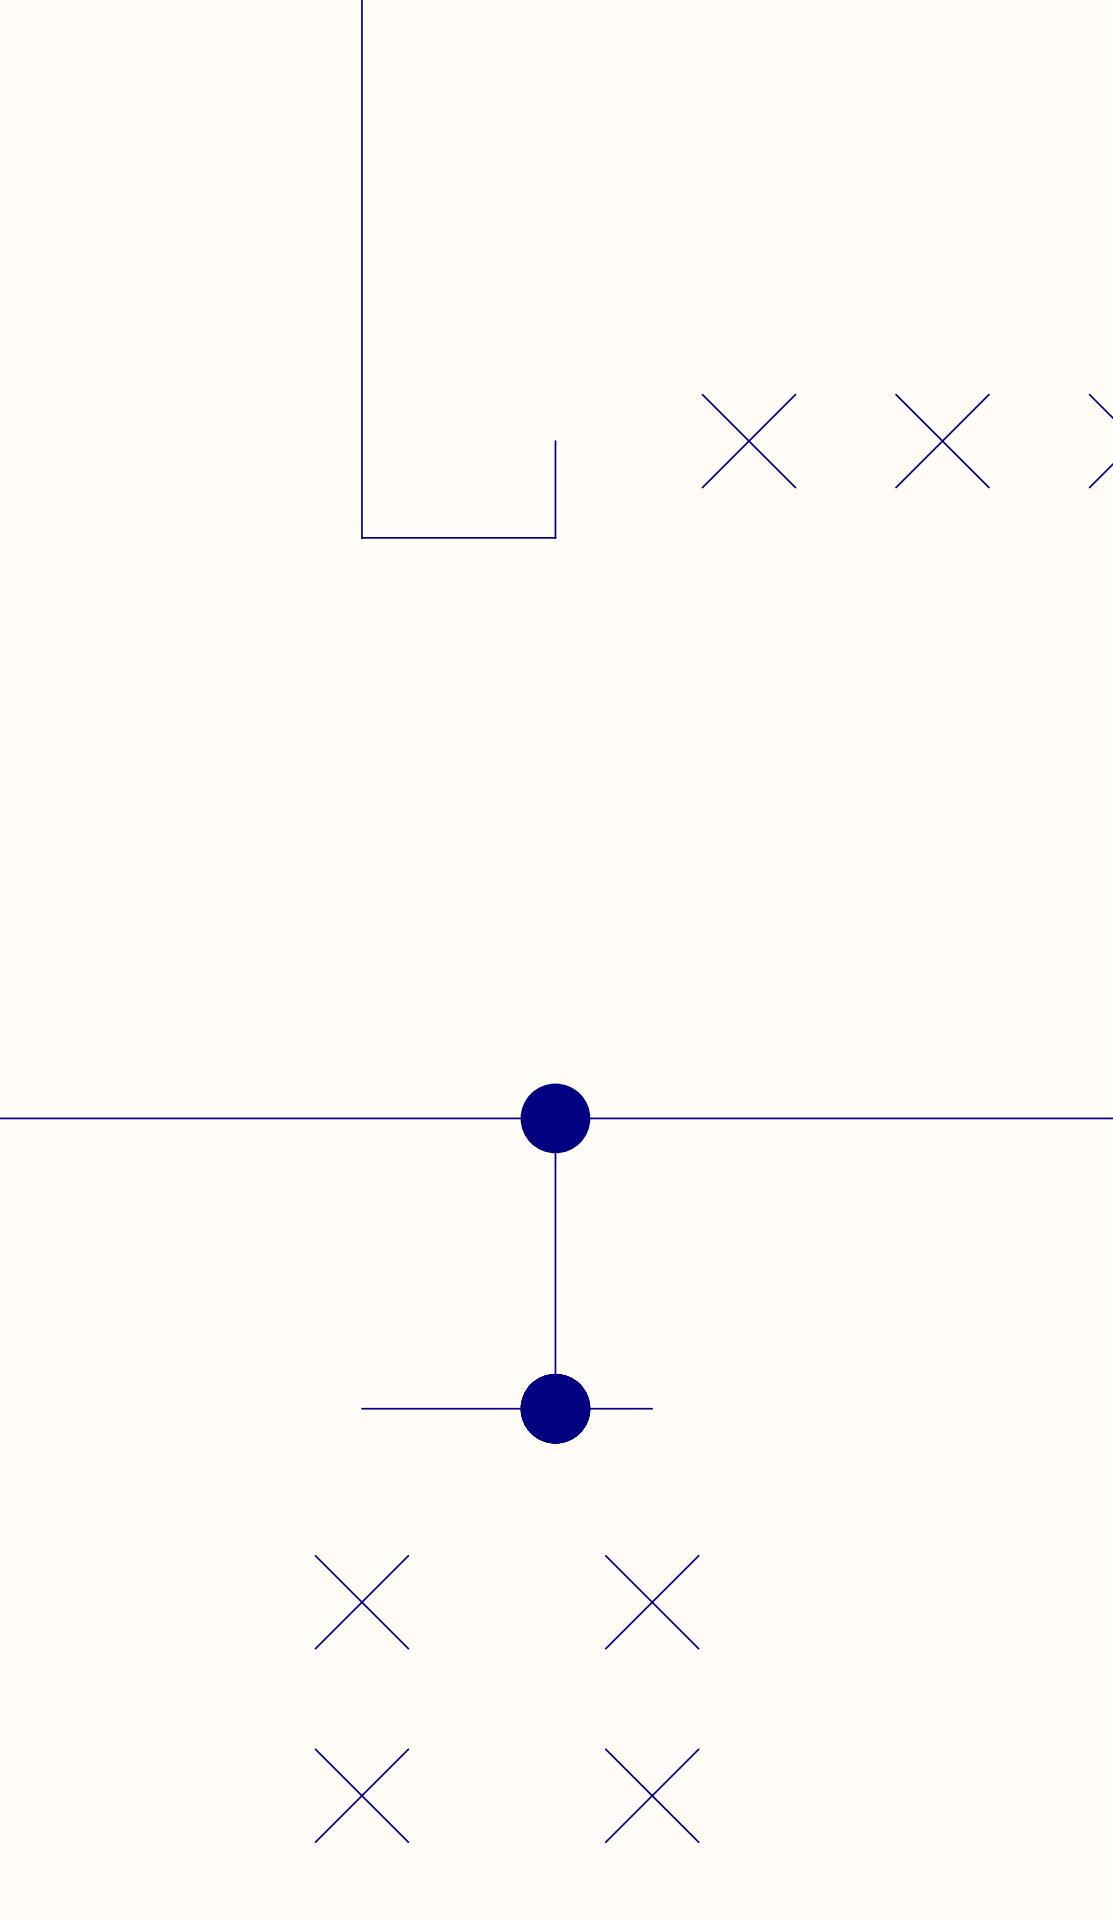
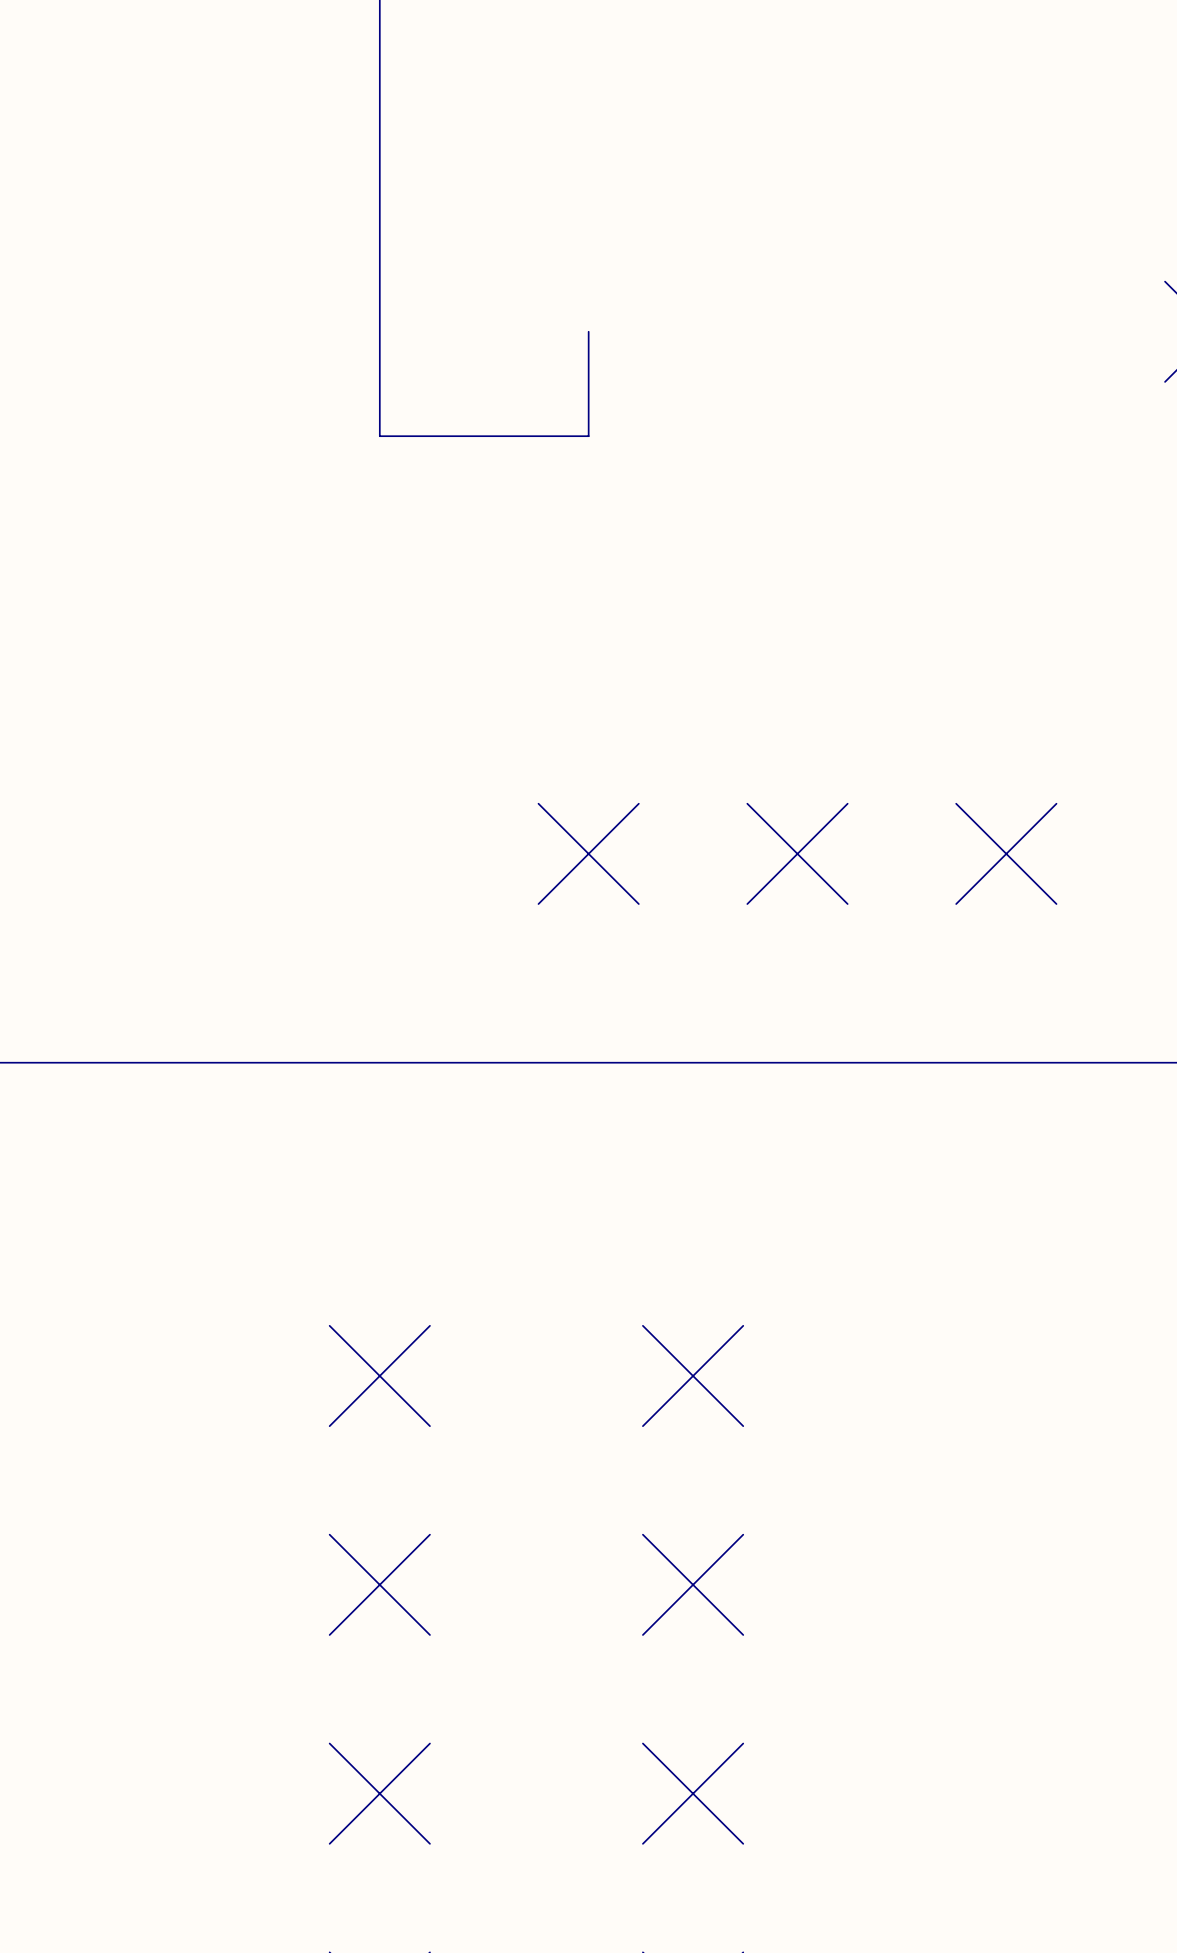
no-connect mark: (748, 441) -> none
no-connect mark: (942, 441) -> none
no-connect mark: none -> (588, 853)
no-connect mark: none -> (797, 853)
no-connect mark: none -> (1006, 853)
wire: (555, 1118) (555, 1408) -> none
junction: (555, 1118) -> none
wire: (361, 1408) (652, 1408) -> none
no-connect mark: none -> (379, 1375)
junction: (555, 1408) -> none
no-connect mark: none -> (693, 1375)

